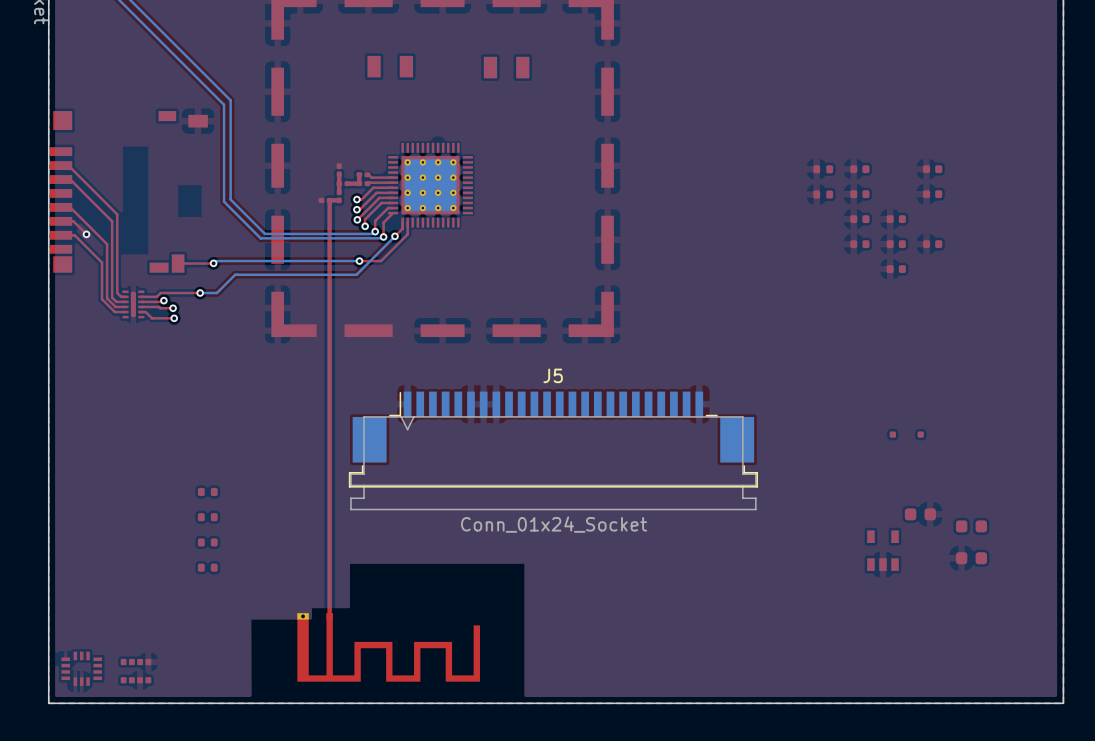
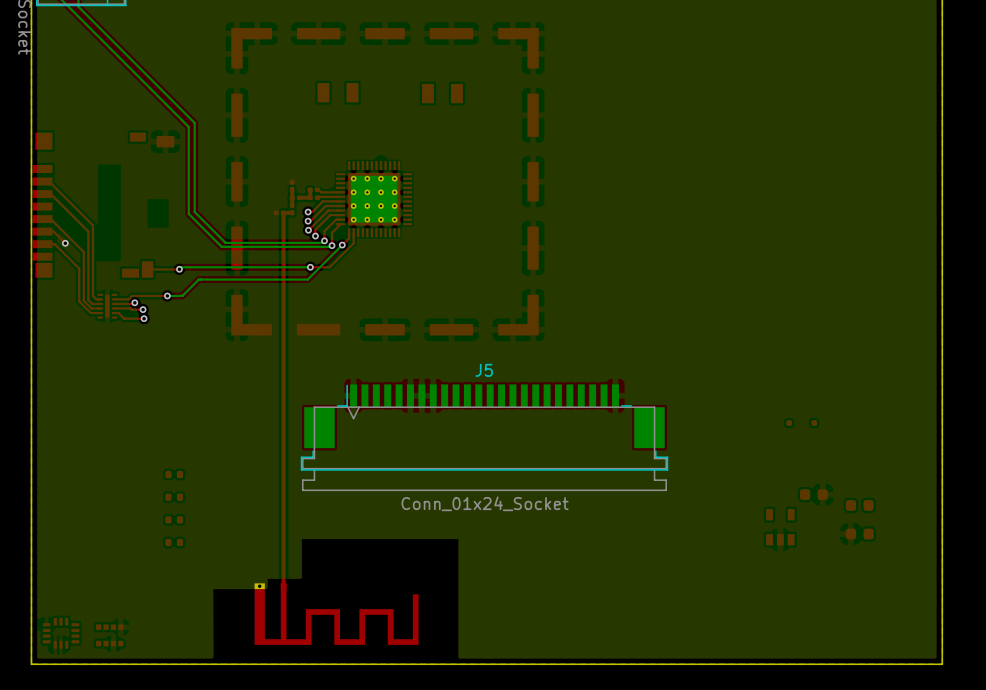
part: (823, 169) -> none
part: (859, 169) -> none
part: (932, 169) -> none
part: (823, 194) -> none
part: (859, 194) -> none
part: (932, 194) -> none
part: (859, 219) -> none
part: (896, 219) -> none
part: (859, 244) -> none
part: (896, 244) -> none
part: (932, 244) -> none
part: (896, 269) -> none

